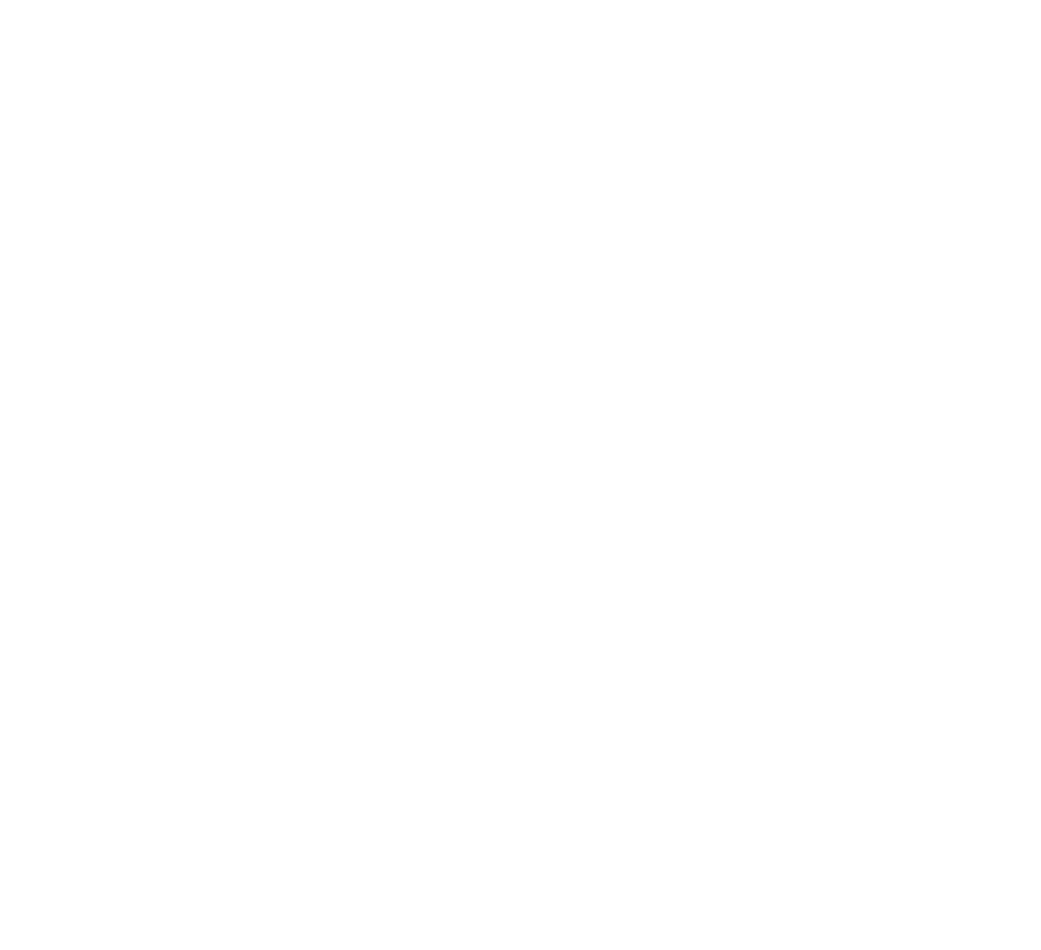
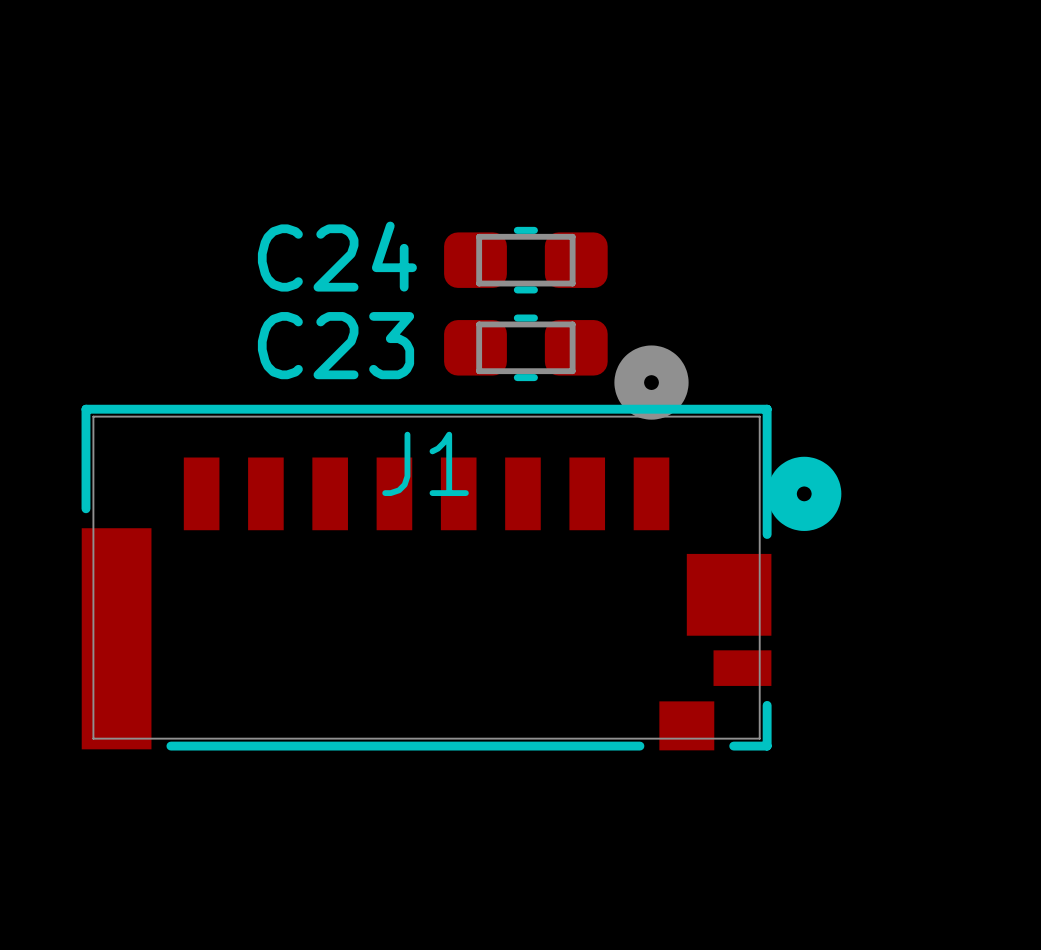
C24: none -> (525, 260)
C23: none -> (525, 347)
J1: none -> (461, 548)

